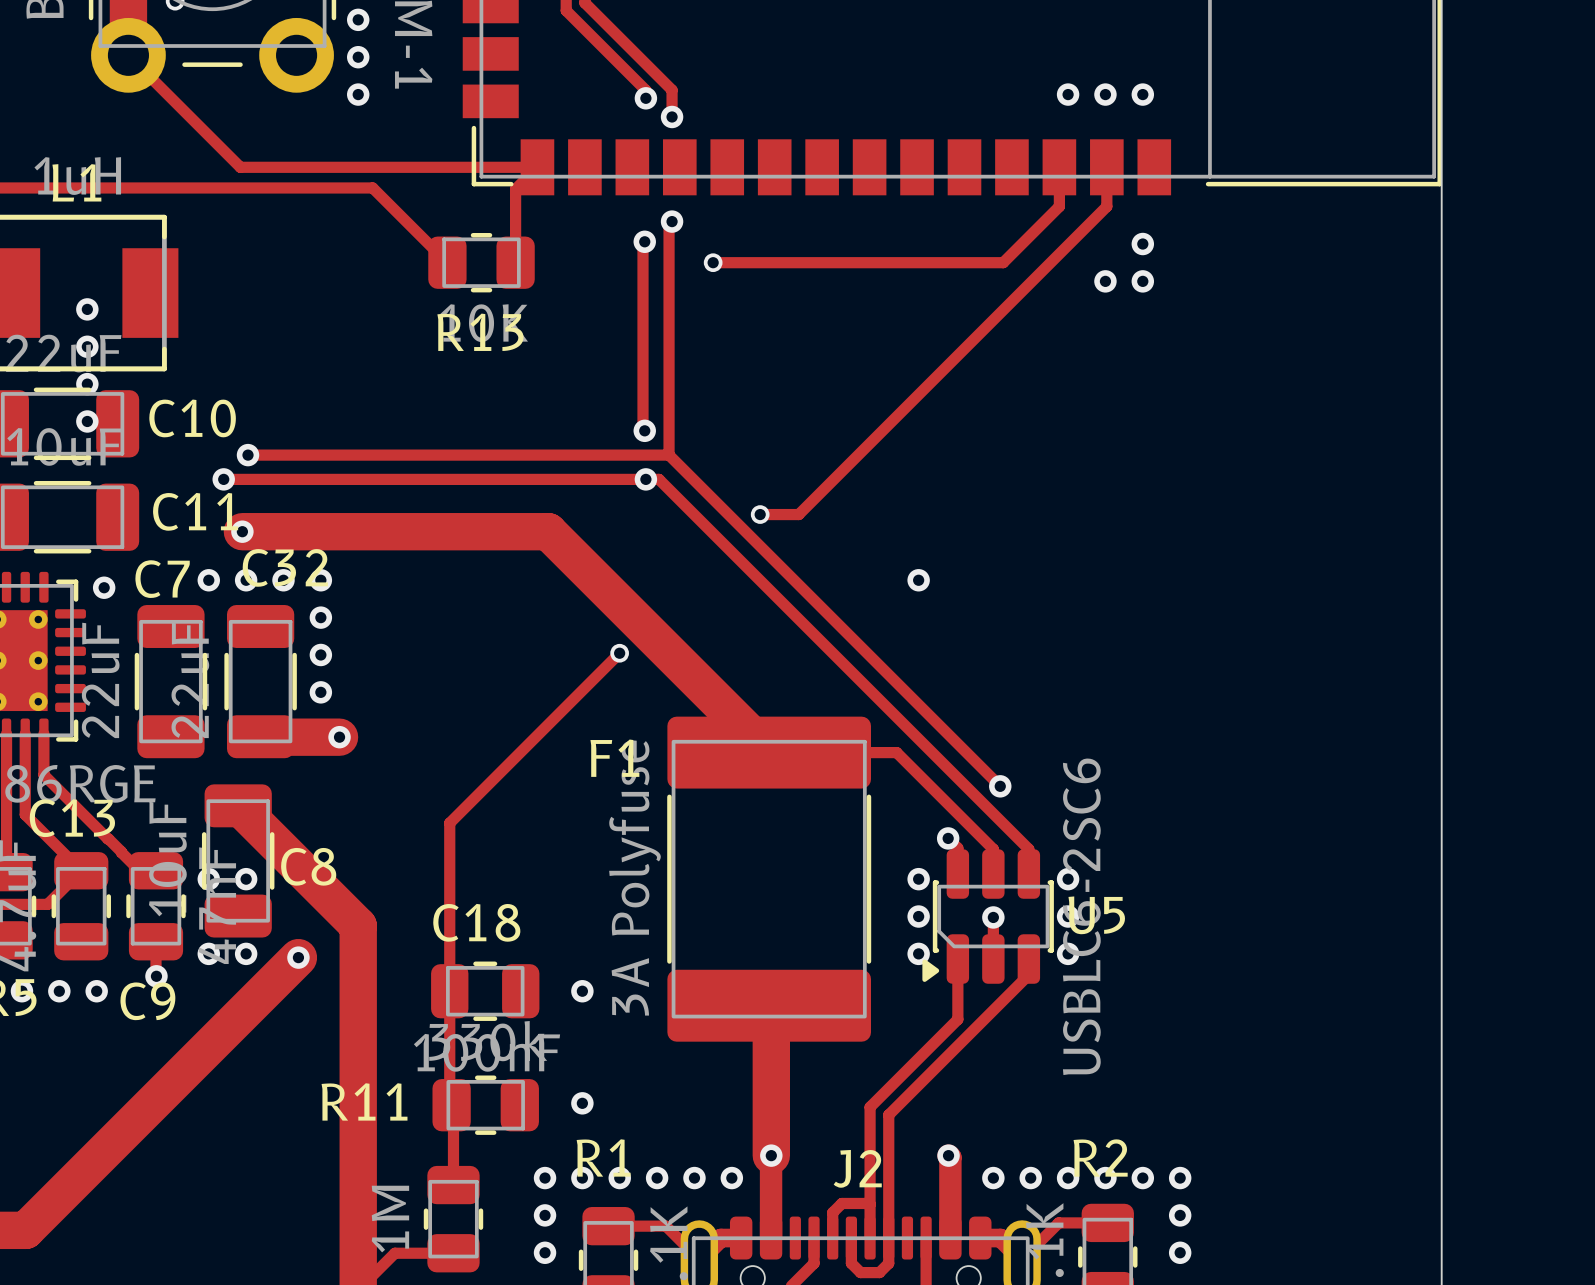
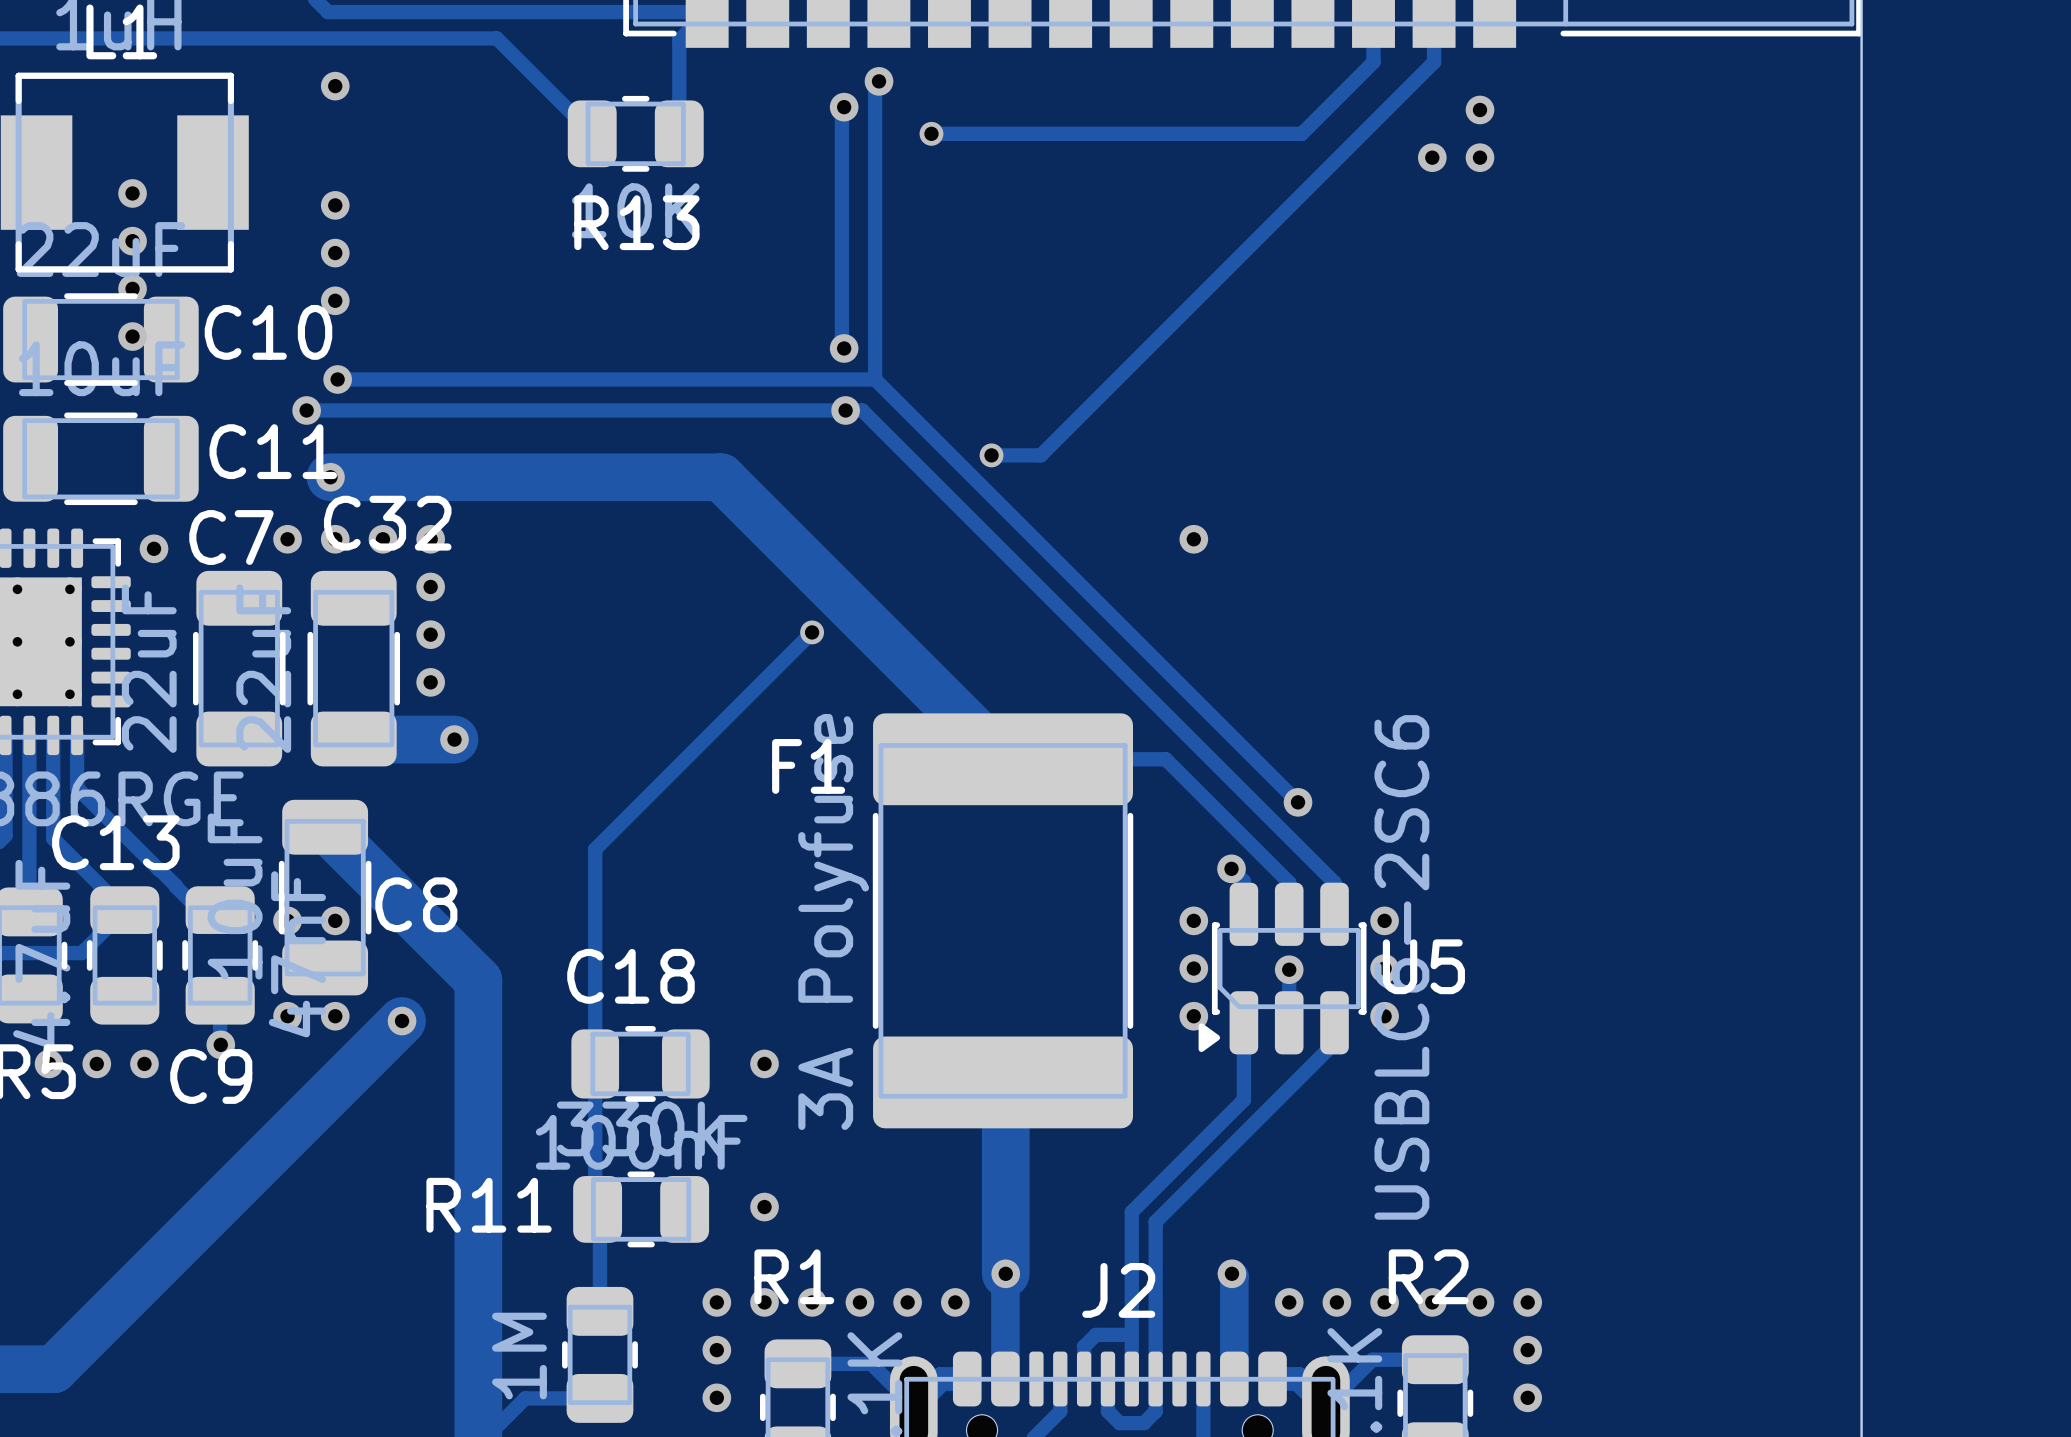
via: none -> (335, 86)
via: none -> (335, 205)
via: none -> (335, 253)
via: none -> (335, 300)

